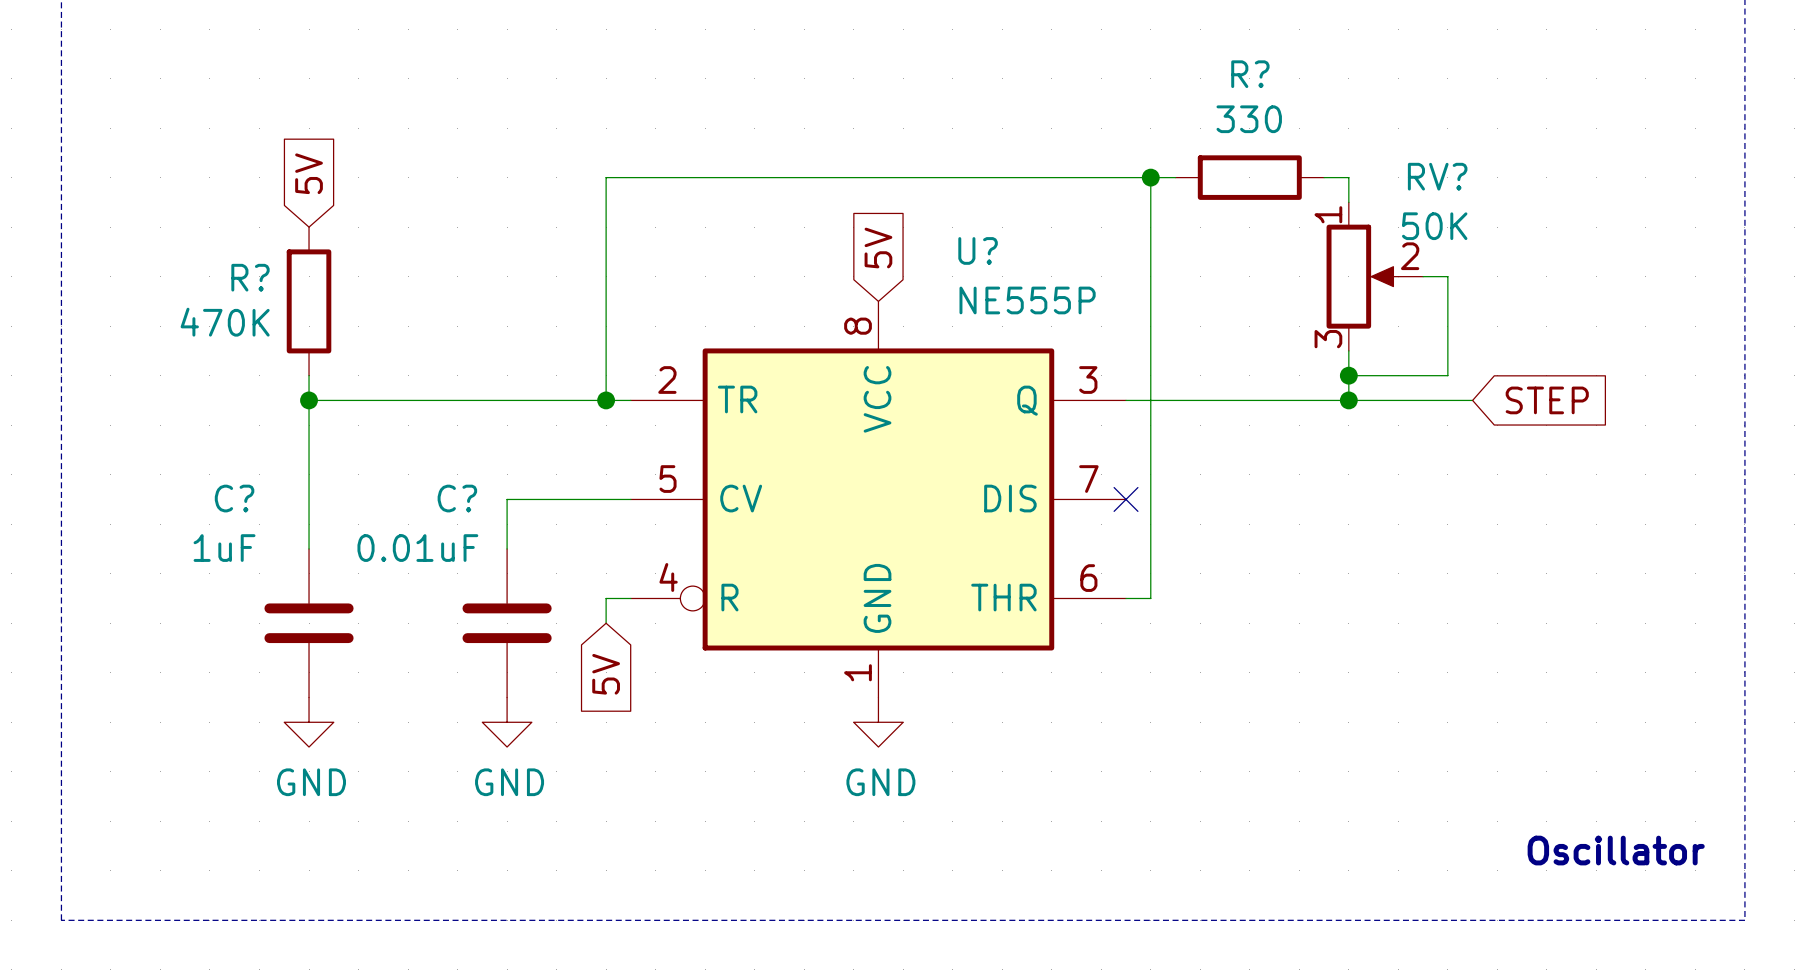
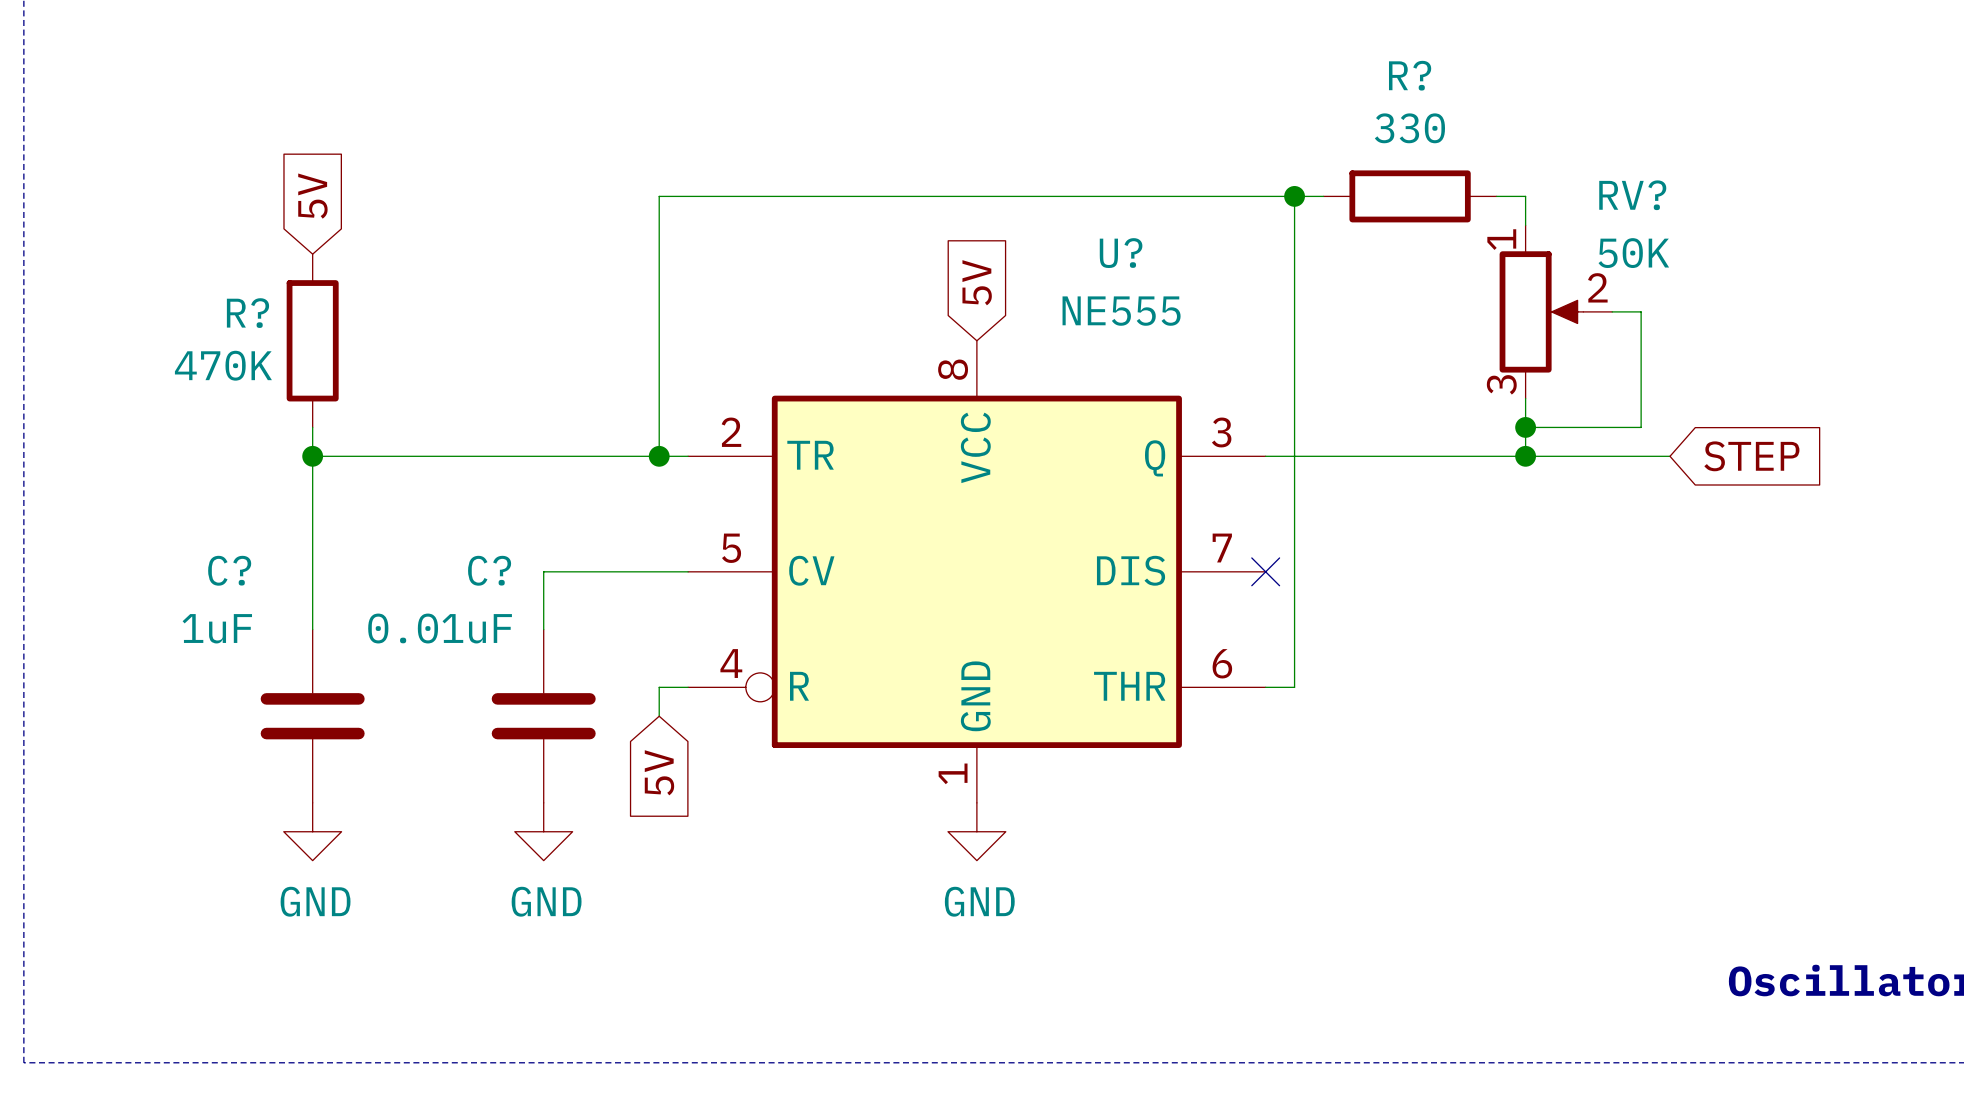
U? name position: U? (978, 250) -> U? (1121, 253)
U? value: NE555P (1027, 300) -> NE555 (1121, 311)

